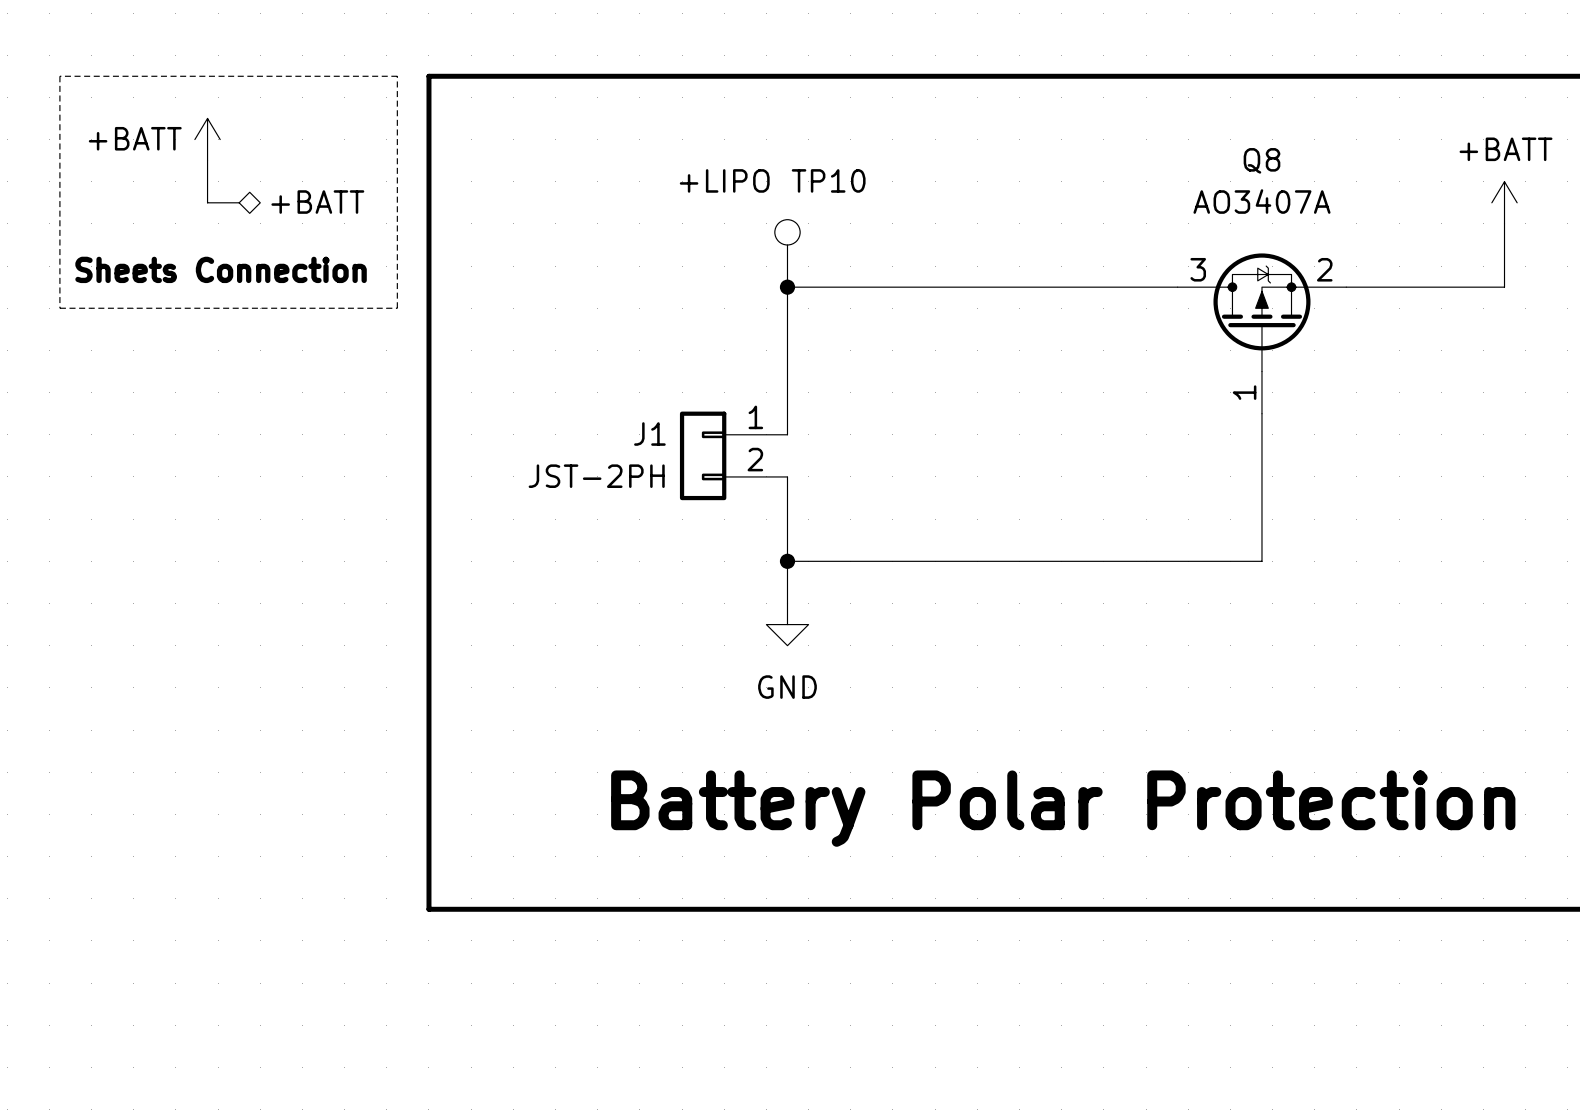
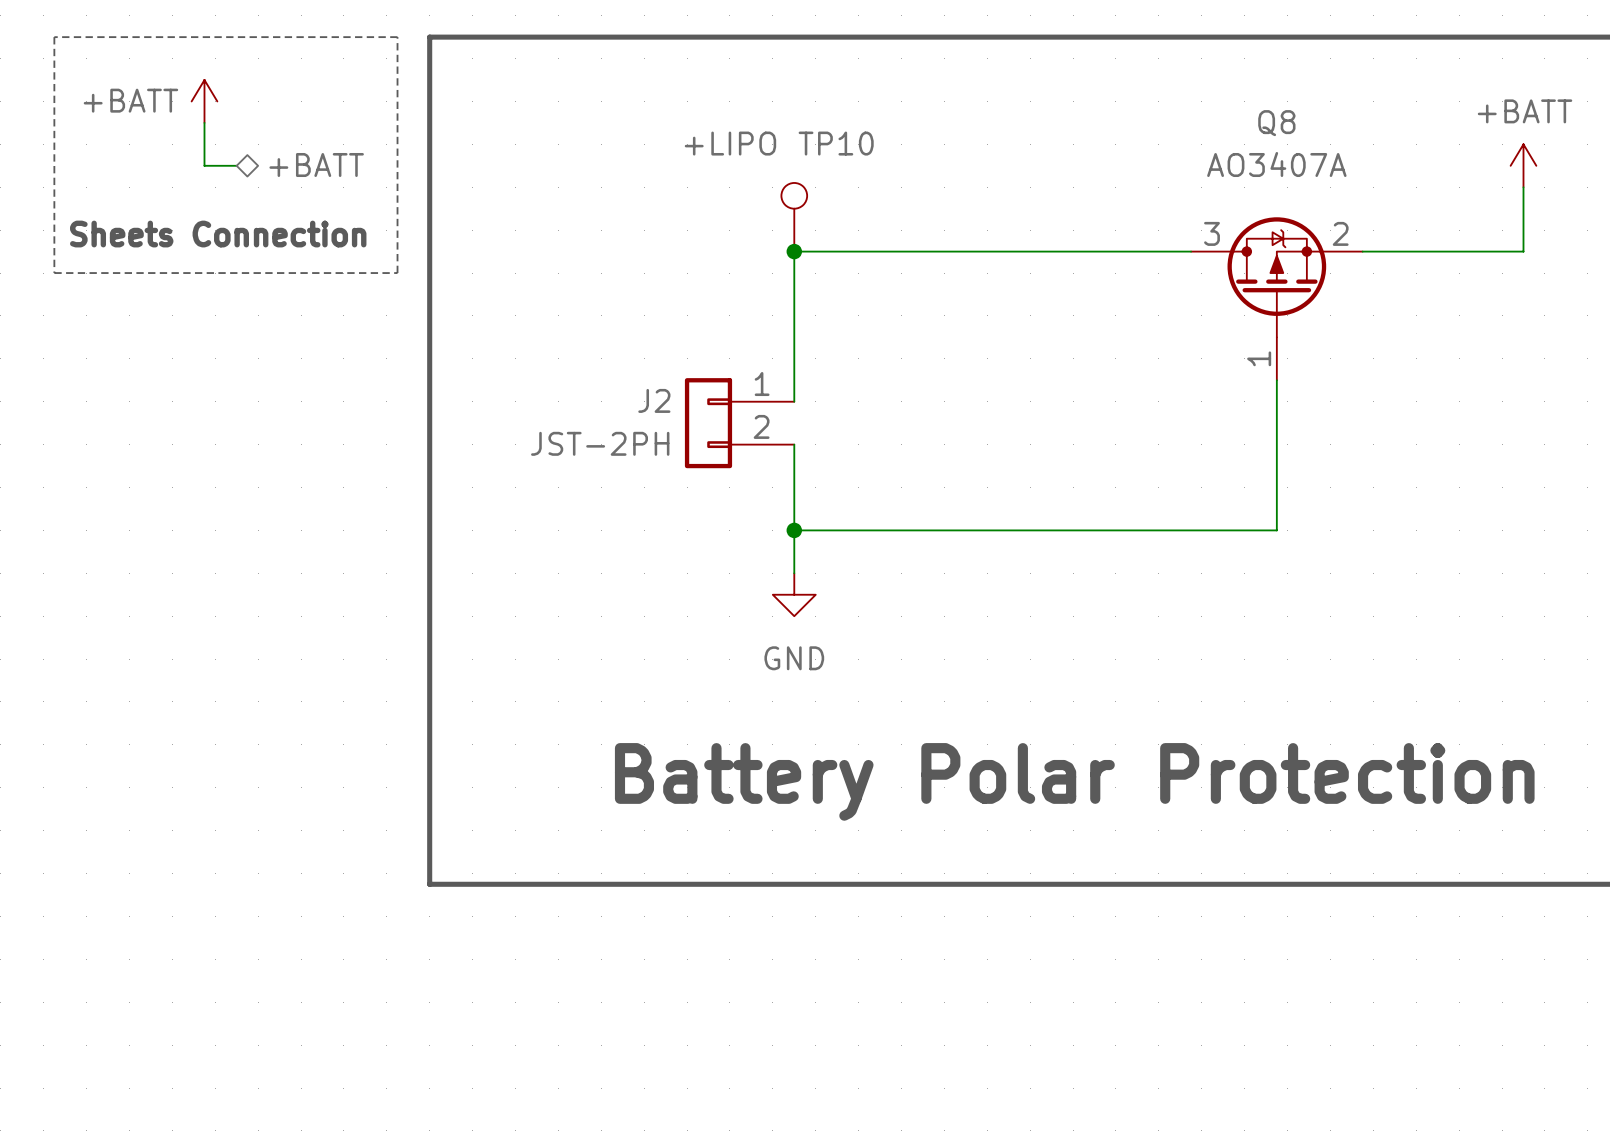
J1 name: J1 (649, 434) -> J2 (654, 400)

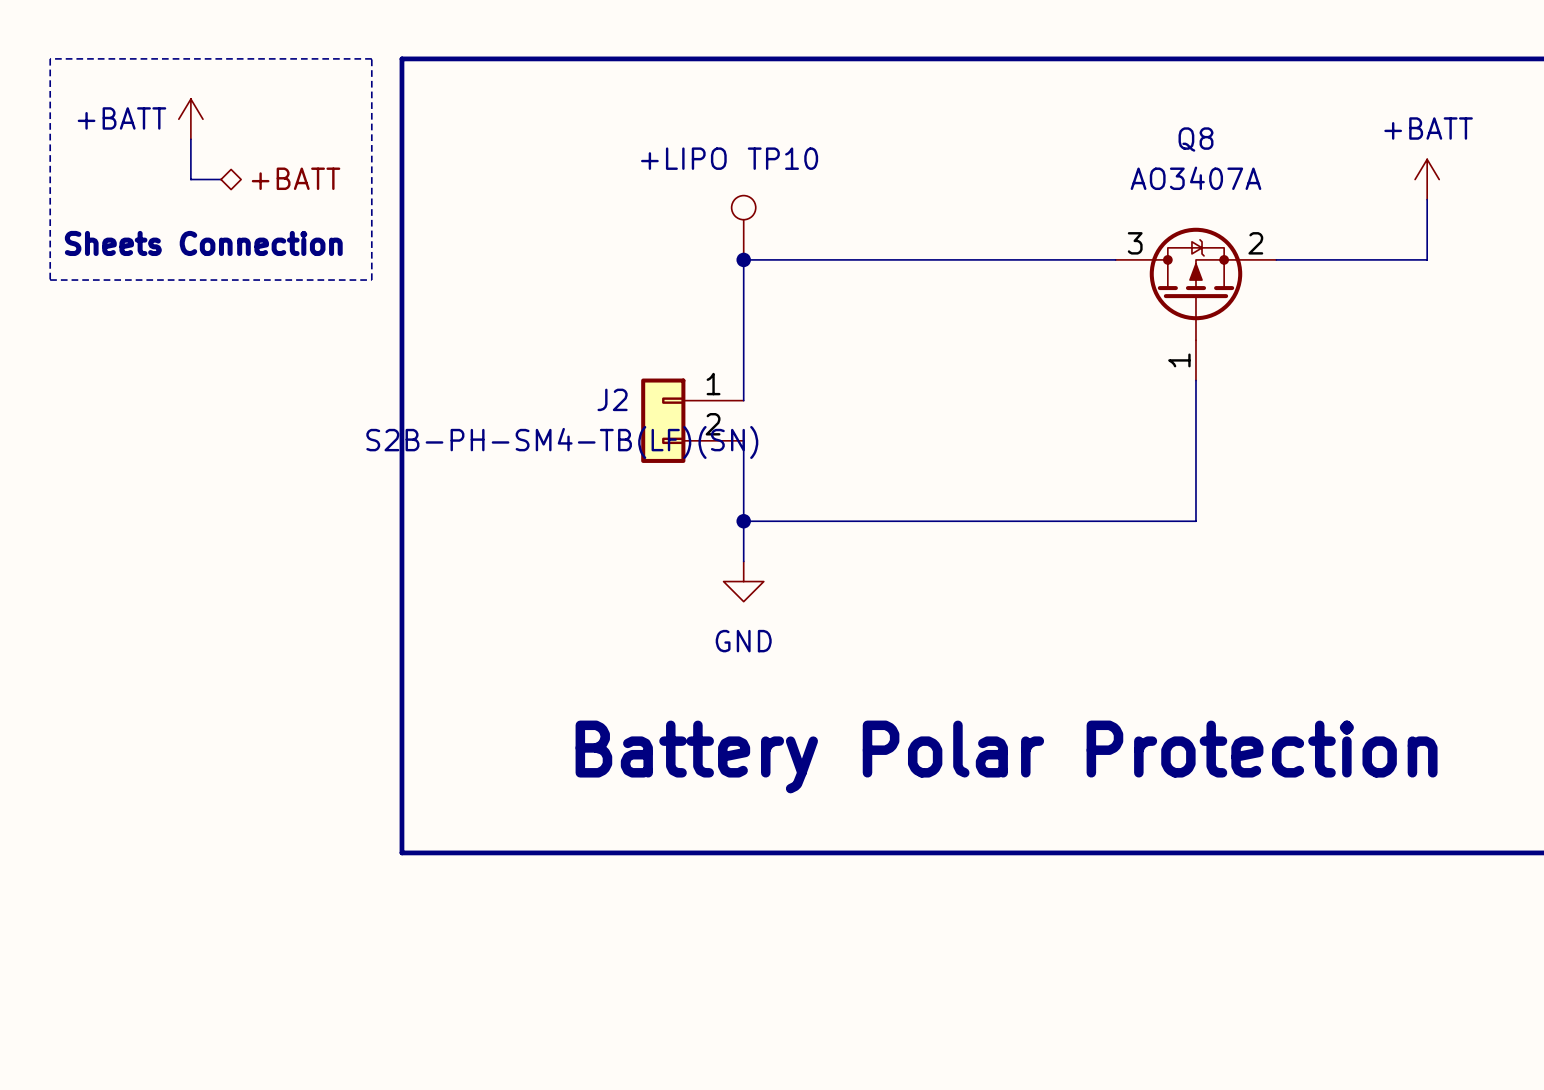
J2 value: JST-2PH (600, 443) -> S2B-PH-SM4-TB(LF)(SN) (562, 442)

